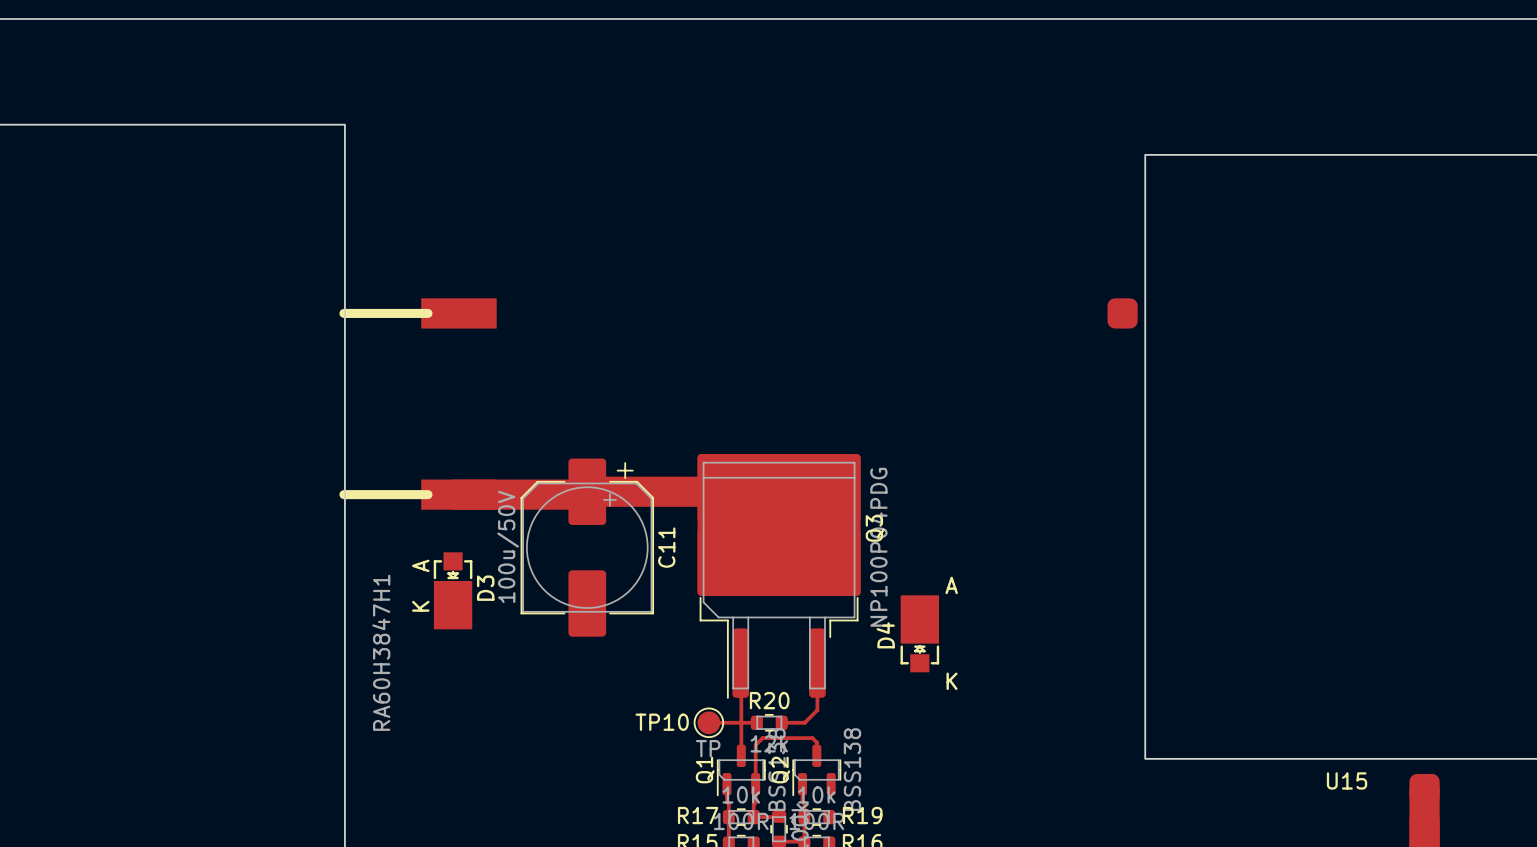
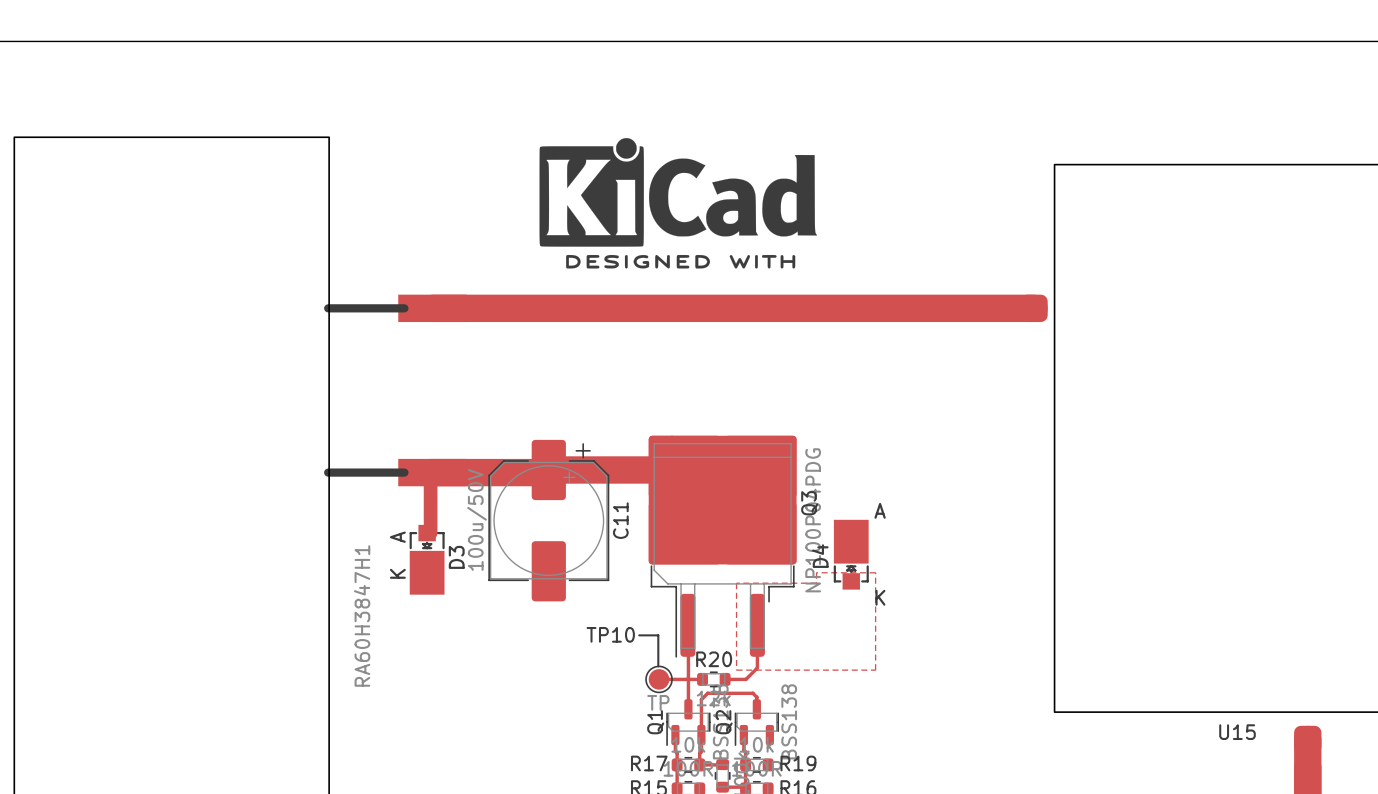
drawing: none -> [539, 138, 818, 269]
top track: none -> (432, 308) (1034, 308)
top track: none -> (432, 472) (430, 474) (430, 533)
top zone outline: none -> (816, 572) (875, 572) (875, 670) (736, 670) (736, 583) (816, 583) (816, 572)
D4 position: (919, 633) -> (851, 554)
line: none -> (639, 635) (658, 635) (658, 666)
TP10 name position: TP10 (662, 722) -> TP10 (610, 634)

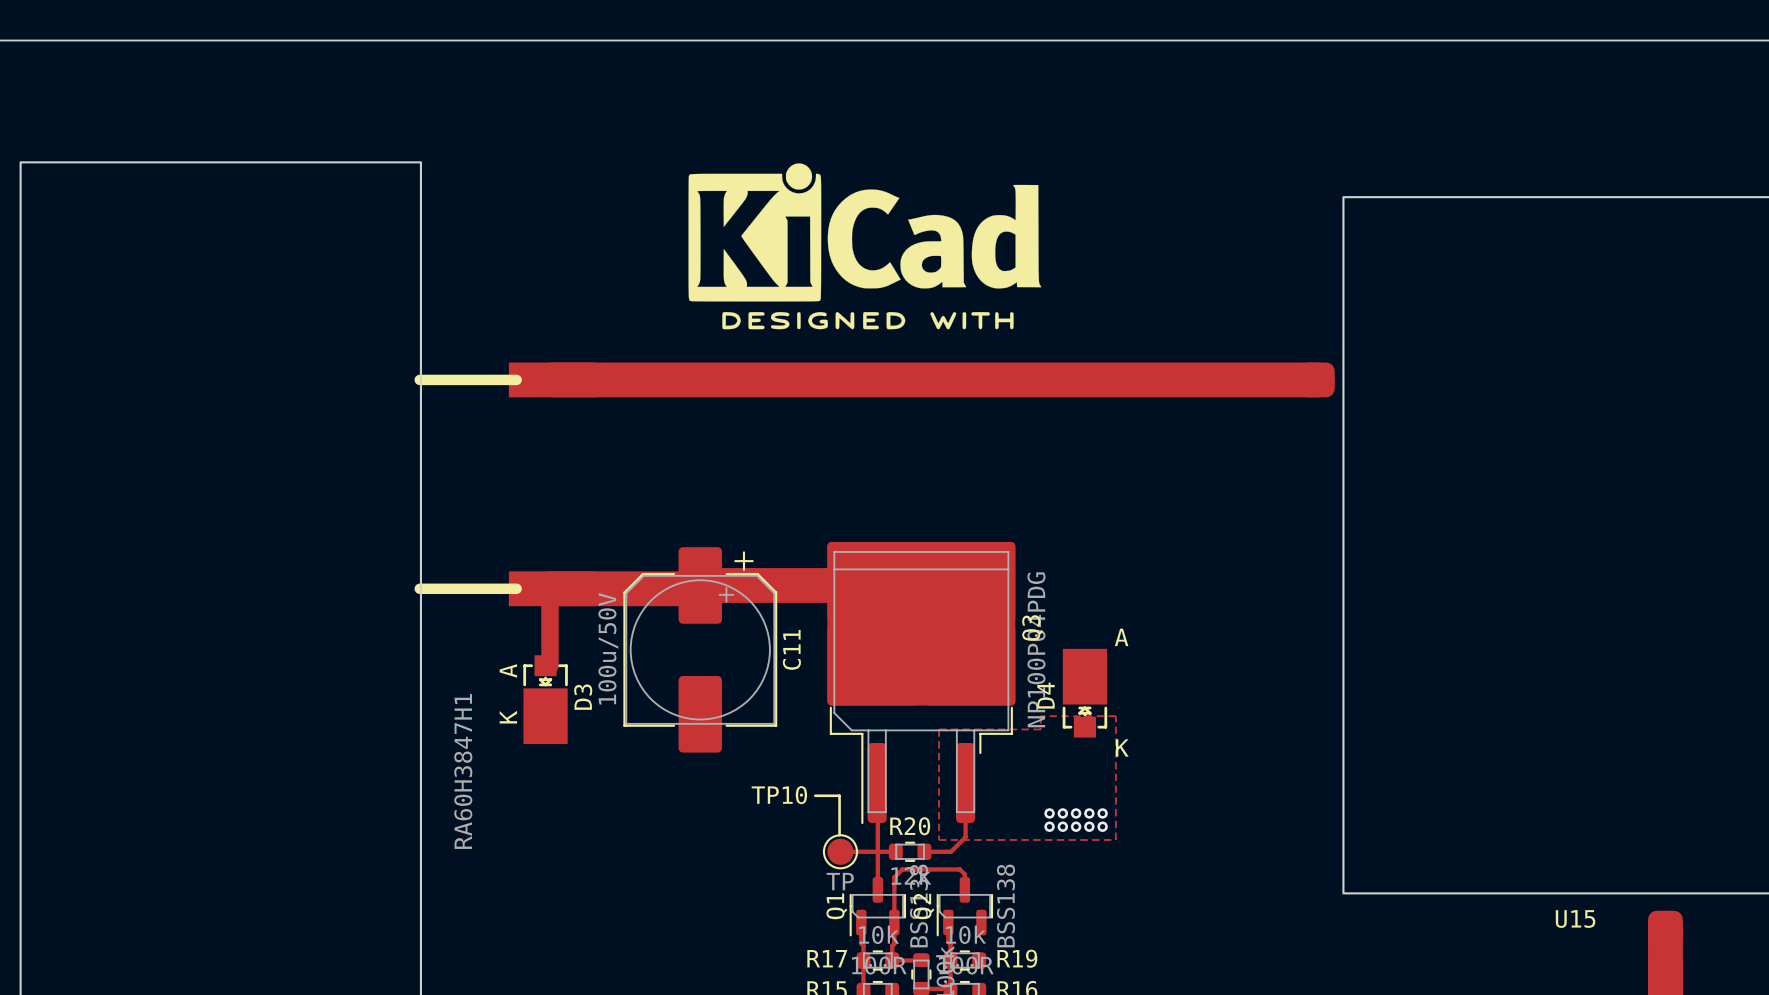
via: none -> (1049, 813)
via: none -> (1062, 813)
via: none -> (1076, 813)
via: none -> (1089, 813)
via: none -> (1102, 813)
via: none -> (1049, 826)
via: none -> (1062, 826)
via: none -> (1076, 826)
via: none -> (1089, 826)
via: none -> (1102, 826)

